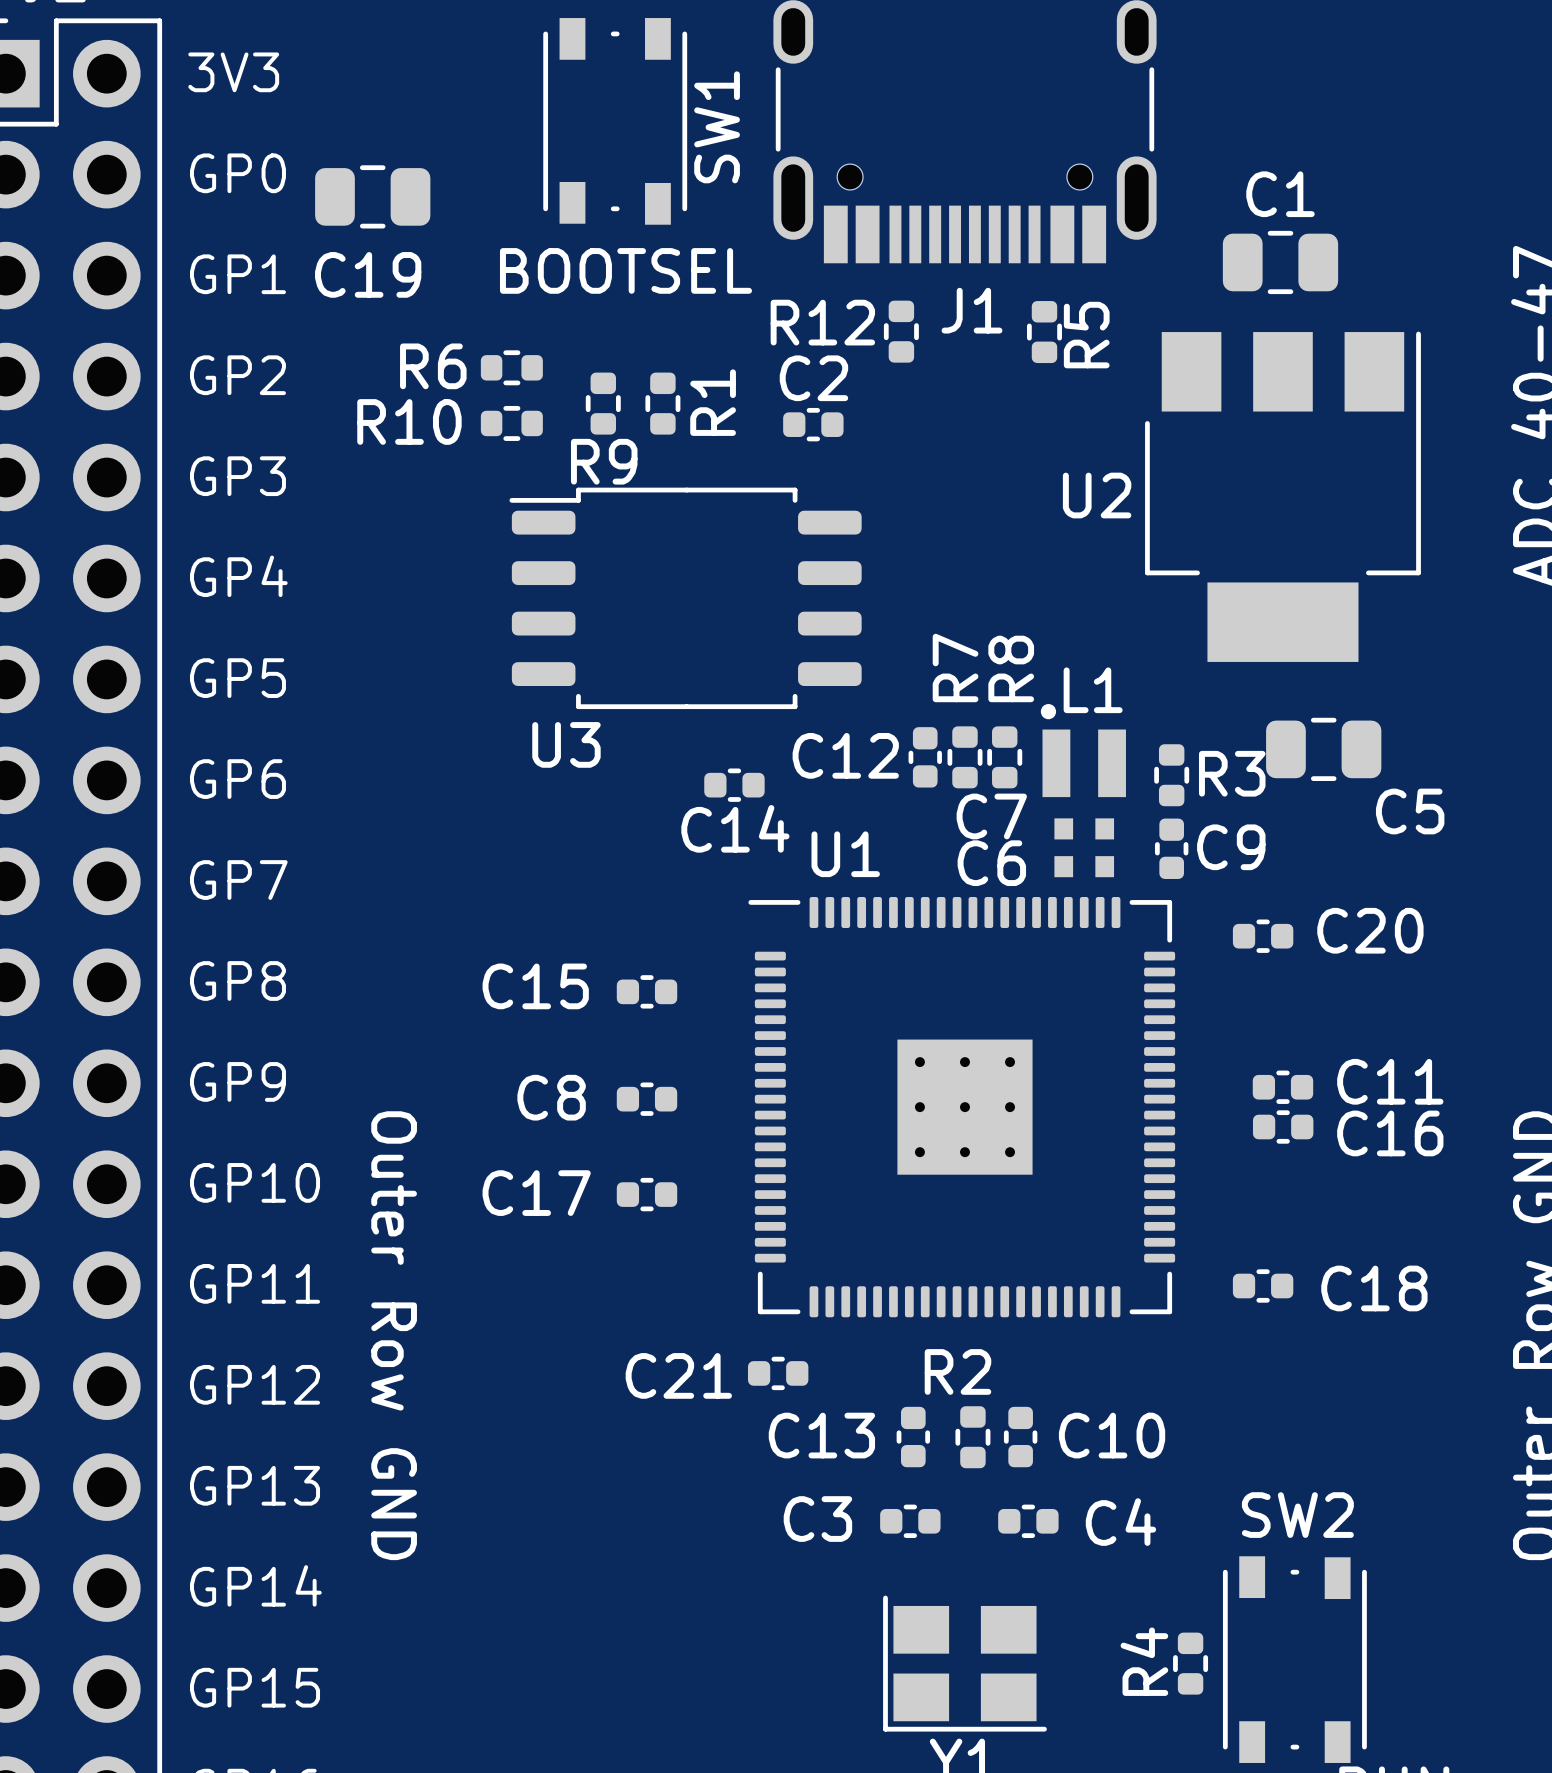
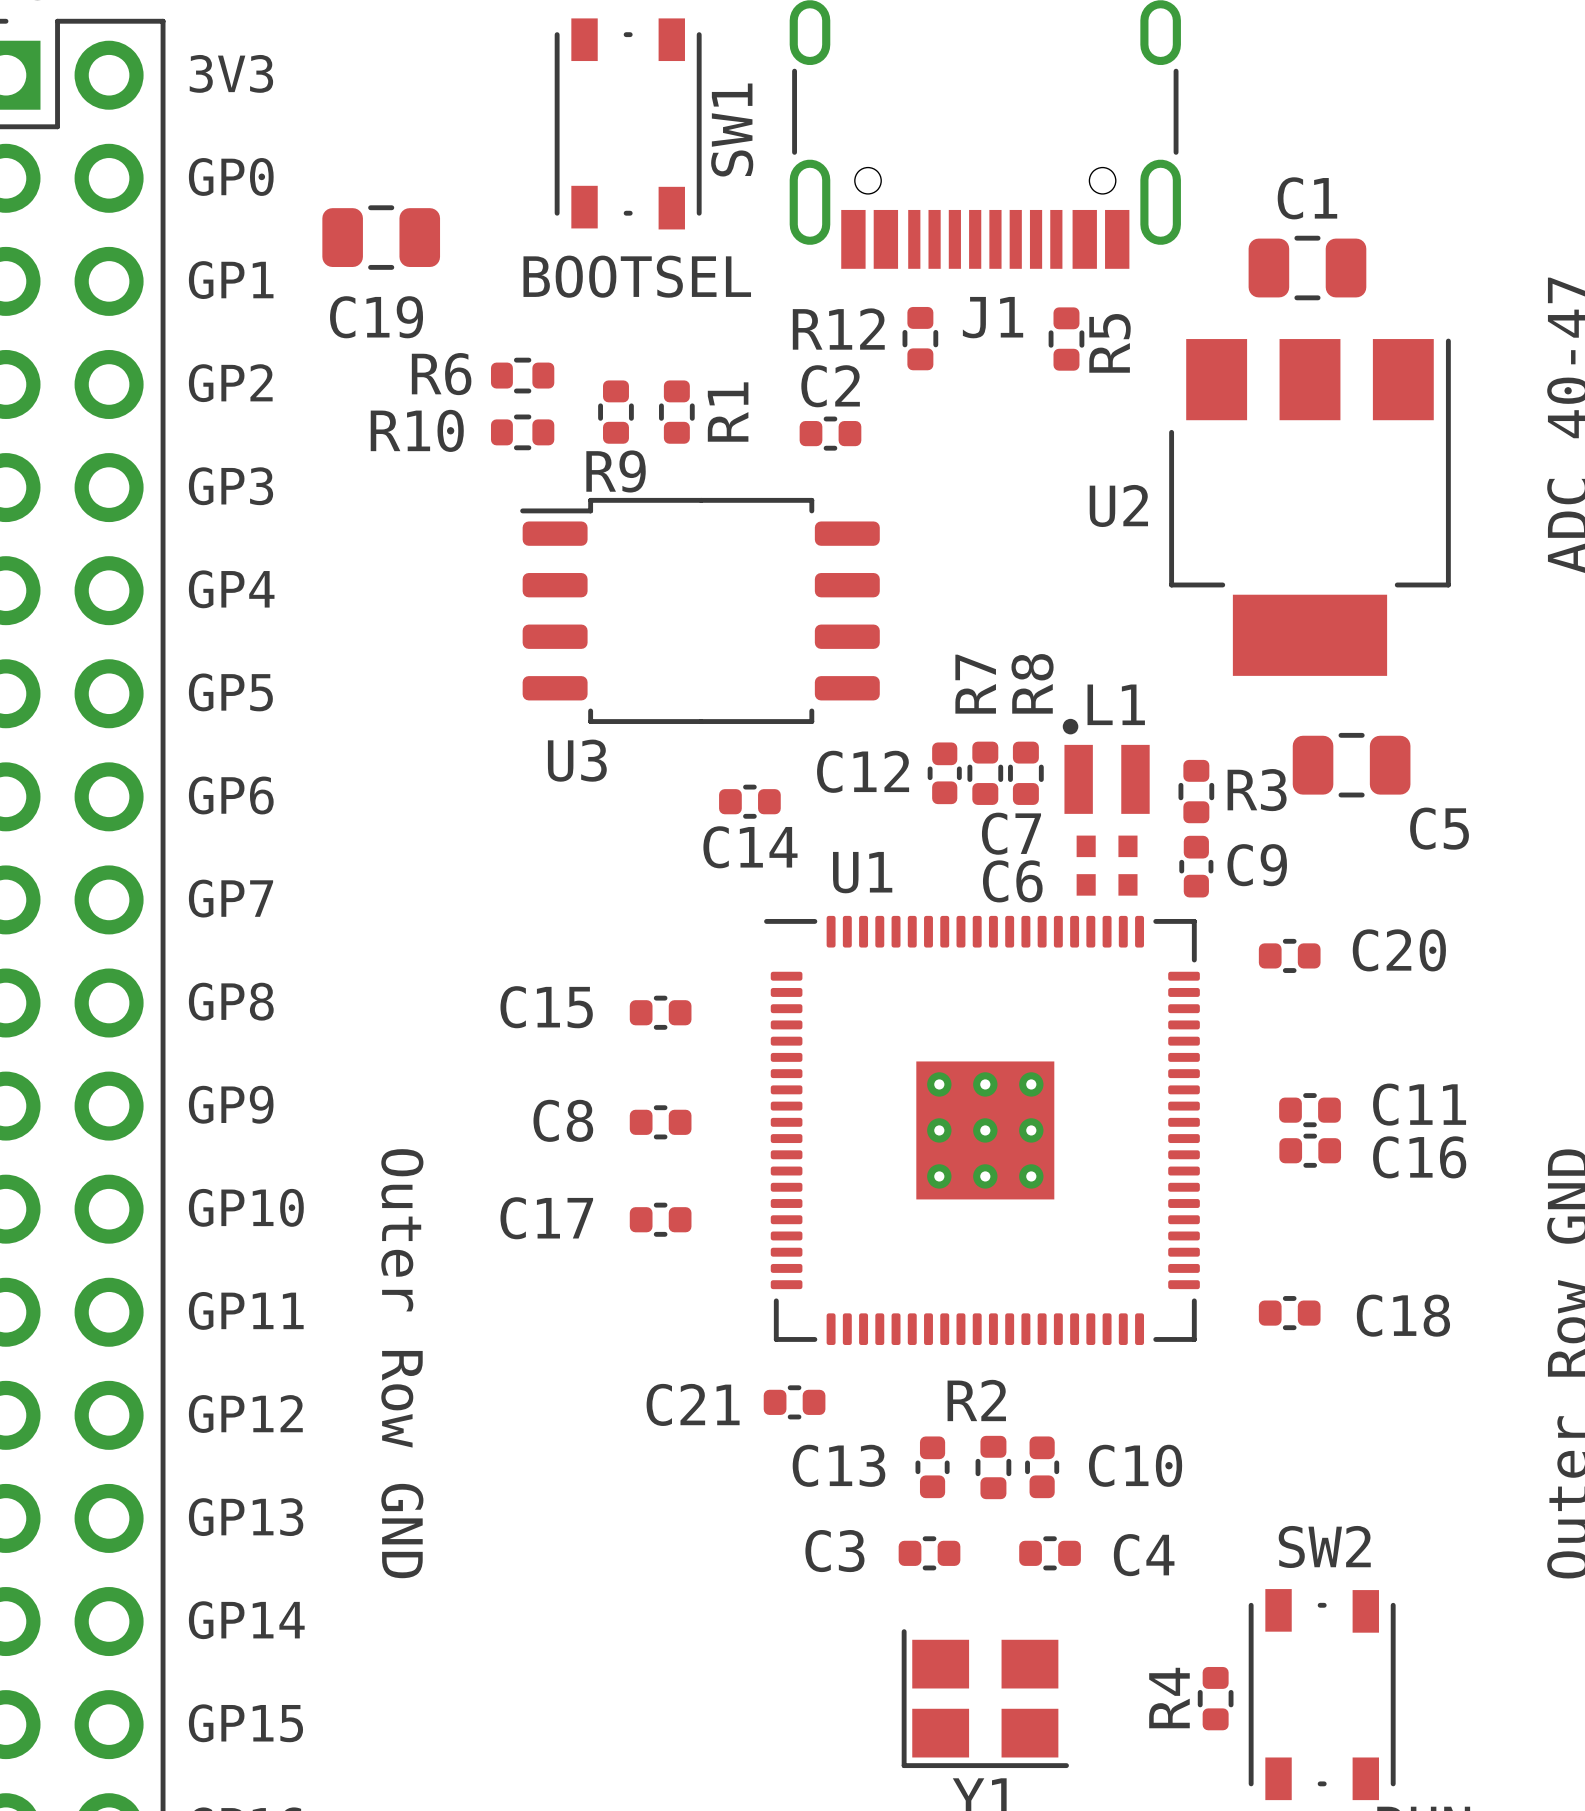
C19 position: (372, 196) -> (381, 237)

